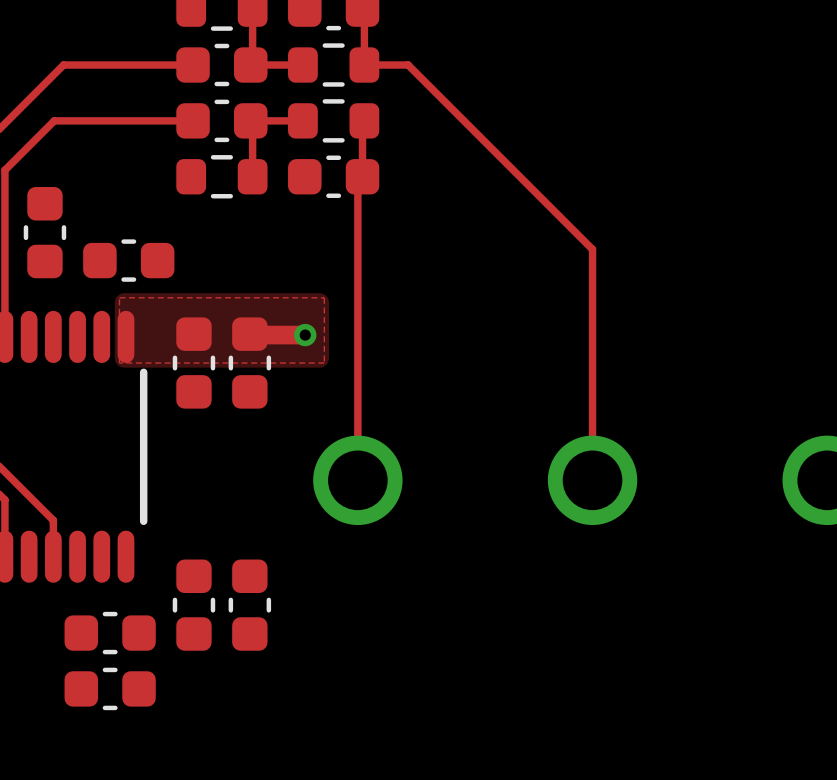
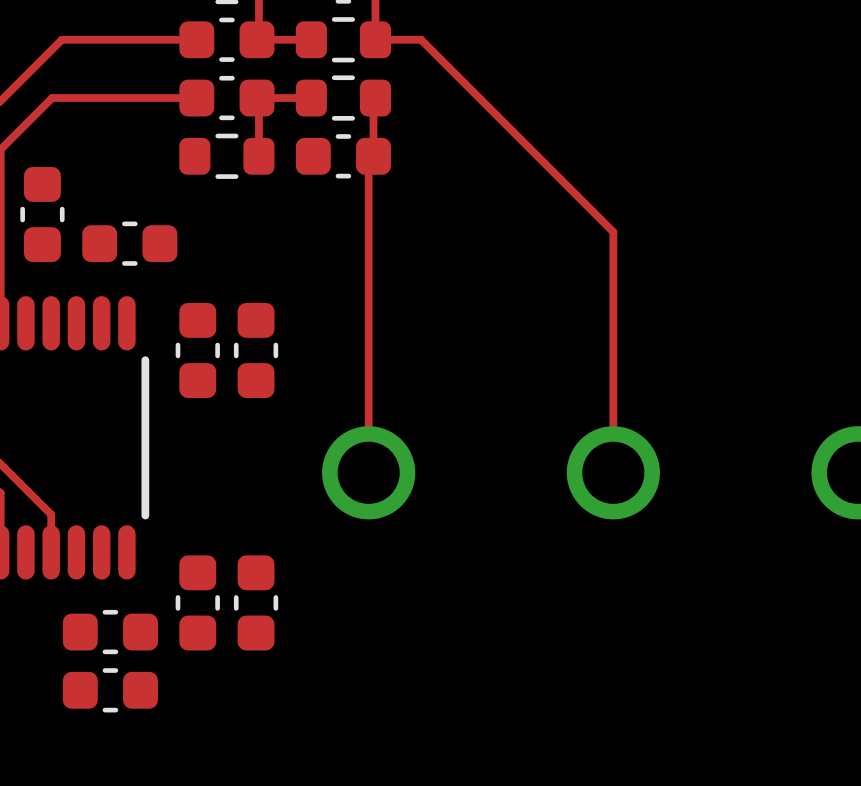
top zone outline: (119, 297) (119, 363) (324, 363) (324, 297) (119, 297) -> none
top track: (250, 335) (305, 335) -> none
via: (305, 335) -> none

